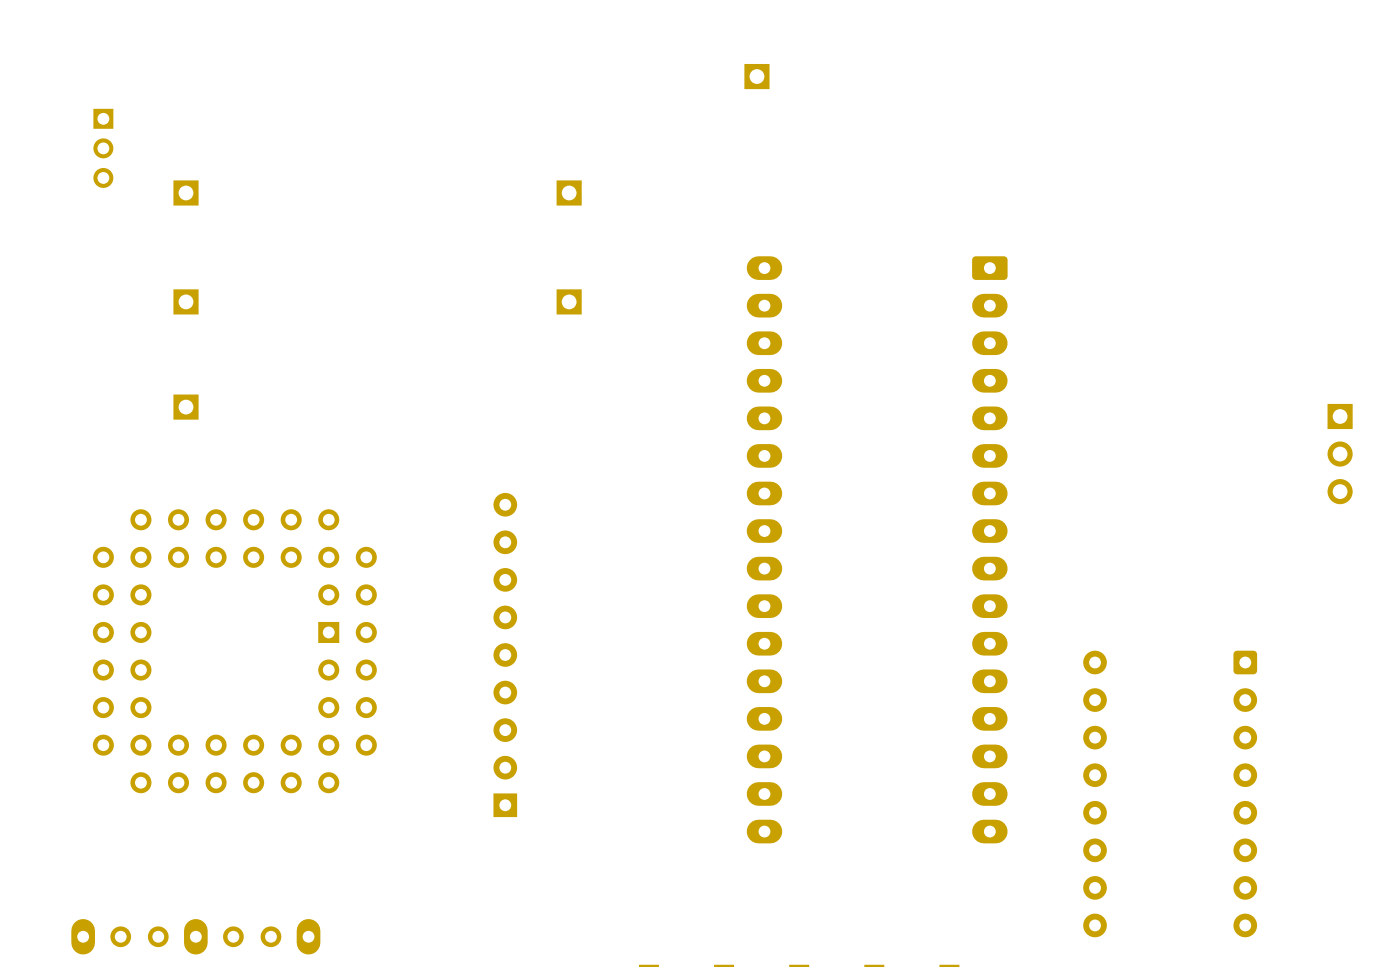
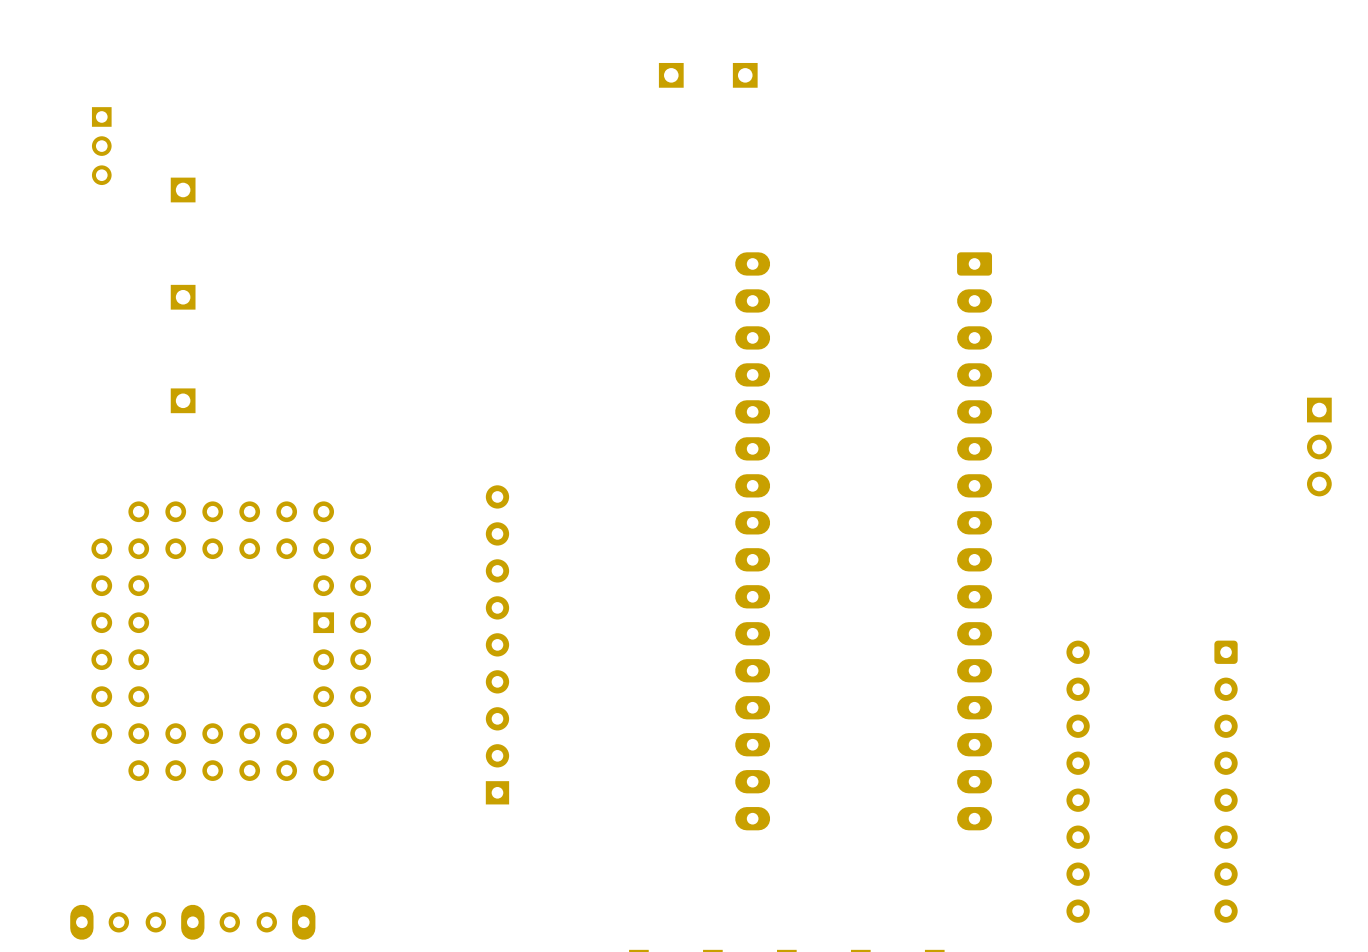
part: none -> (671, 75)
part: (569, 192) -> none
part: (569, 301) -> none

